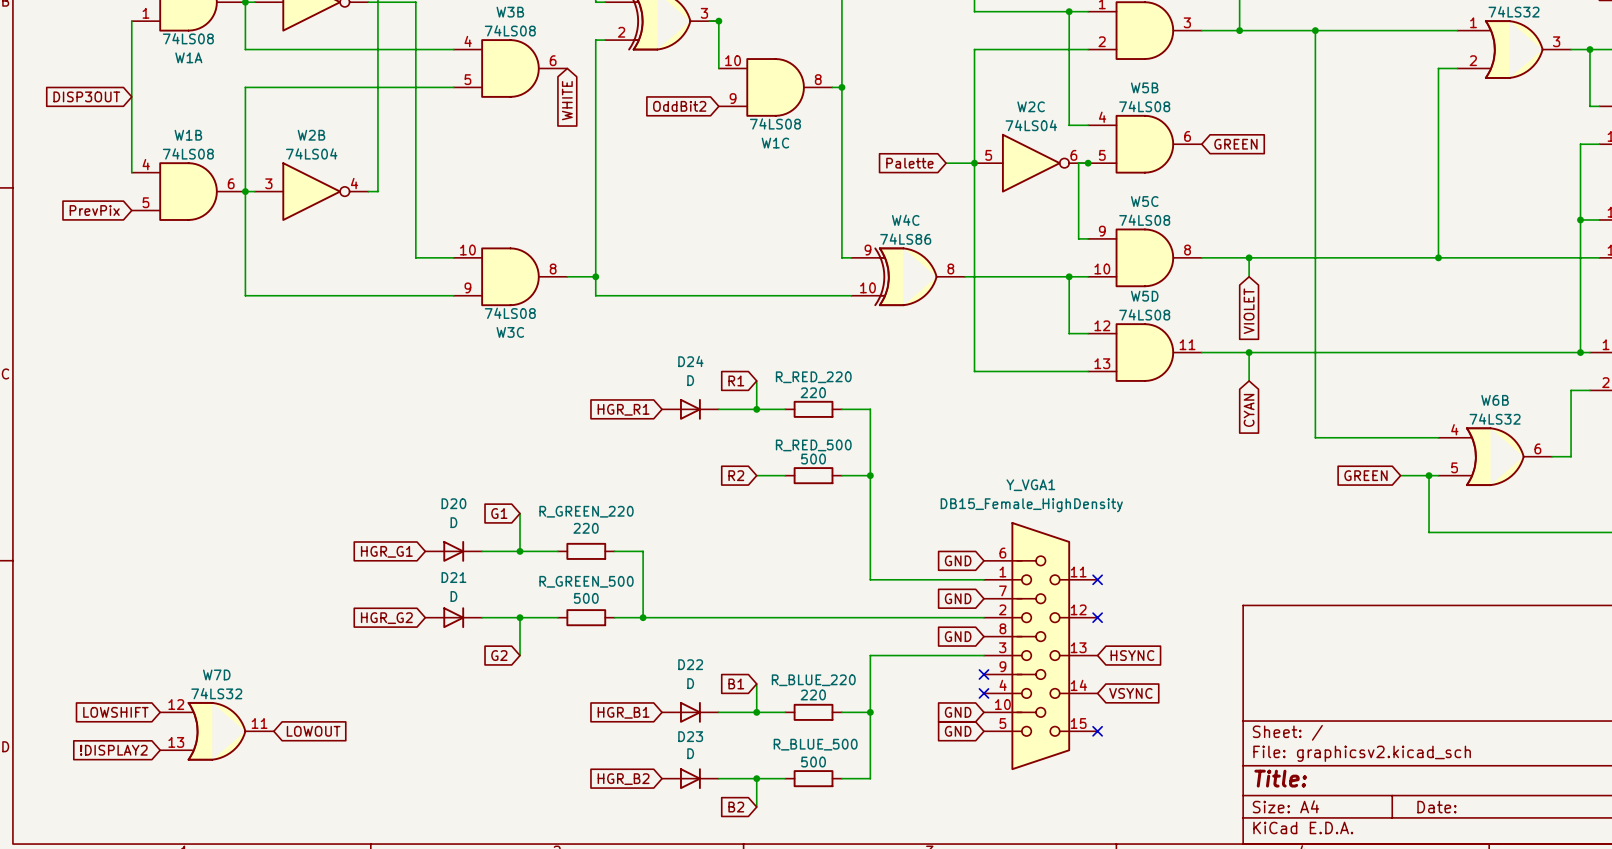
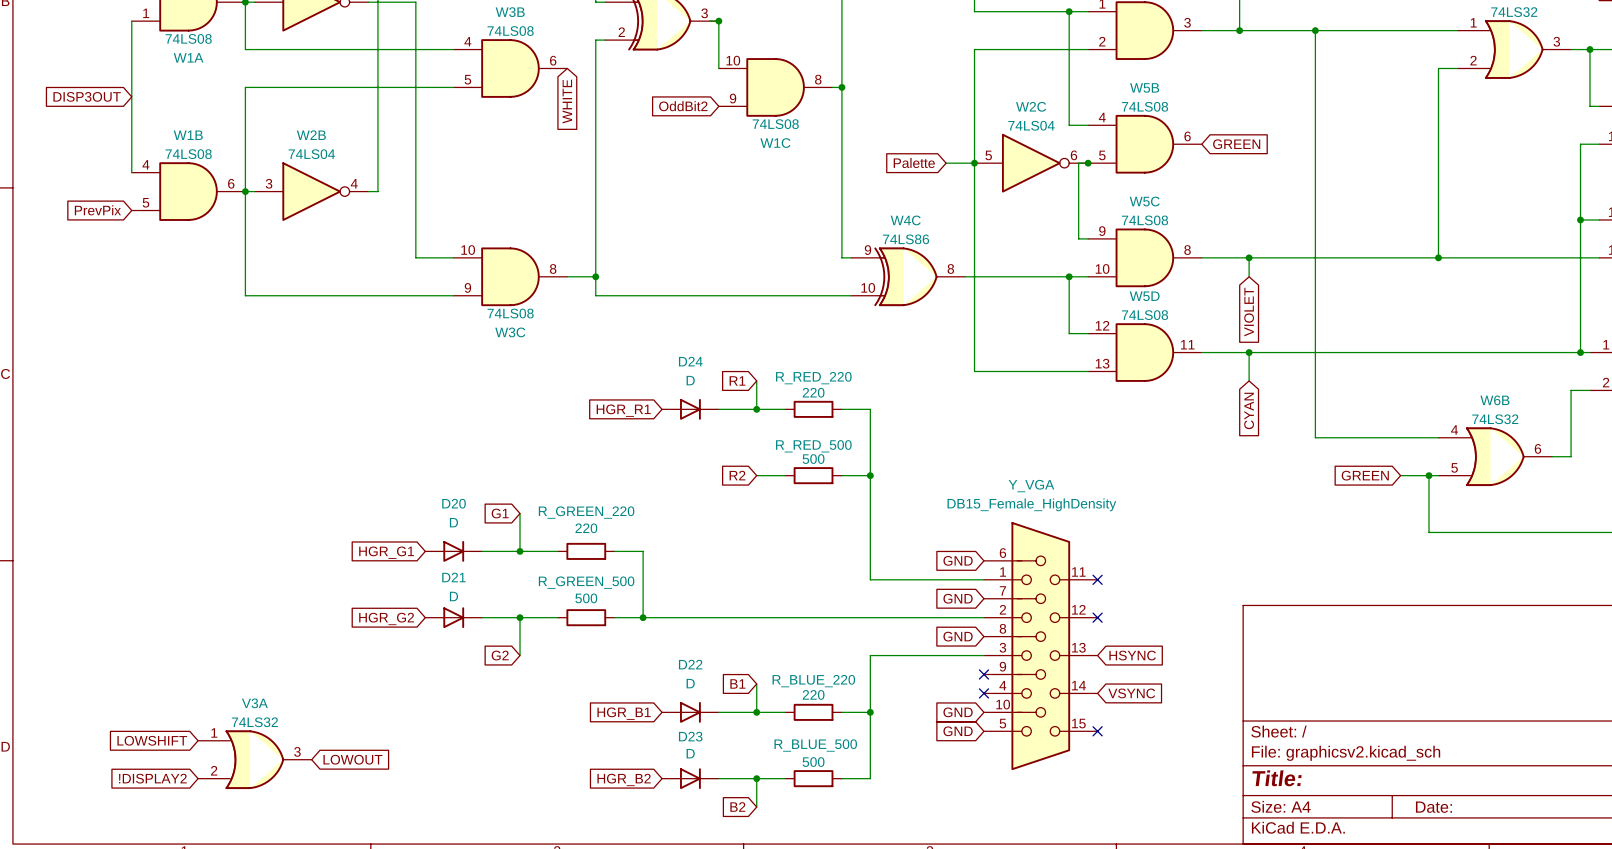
Y_VGA1 name: Y_VGA1 (1030, 485) -> Y_VGA (1031, 486)
global label position: LOWSHIFT (115, 712) -> LOWSHIFT (152, 740)
W7D: 74LS32 (217, 731) -> none
global label position: LOWOUT (313, 731) -> LOWOUT (352, 759)
global label position: !DISPLAY2 (113, 750) -> !DISPLAY2 (152, 778)
V3A: none -> 74LS32 (254, 759)

